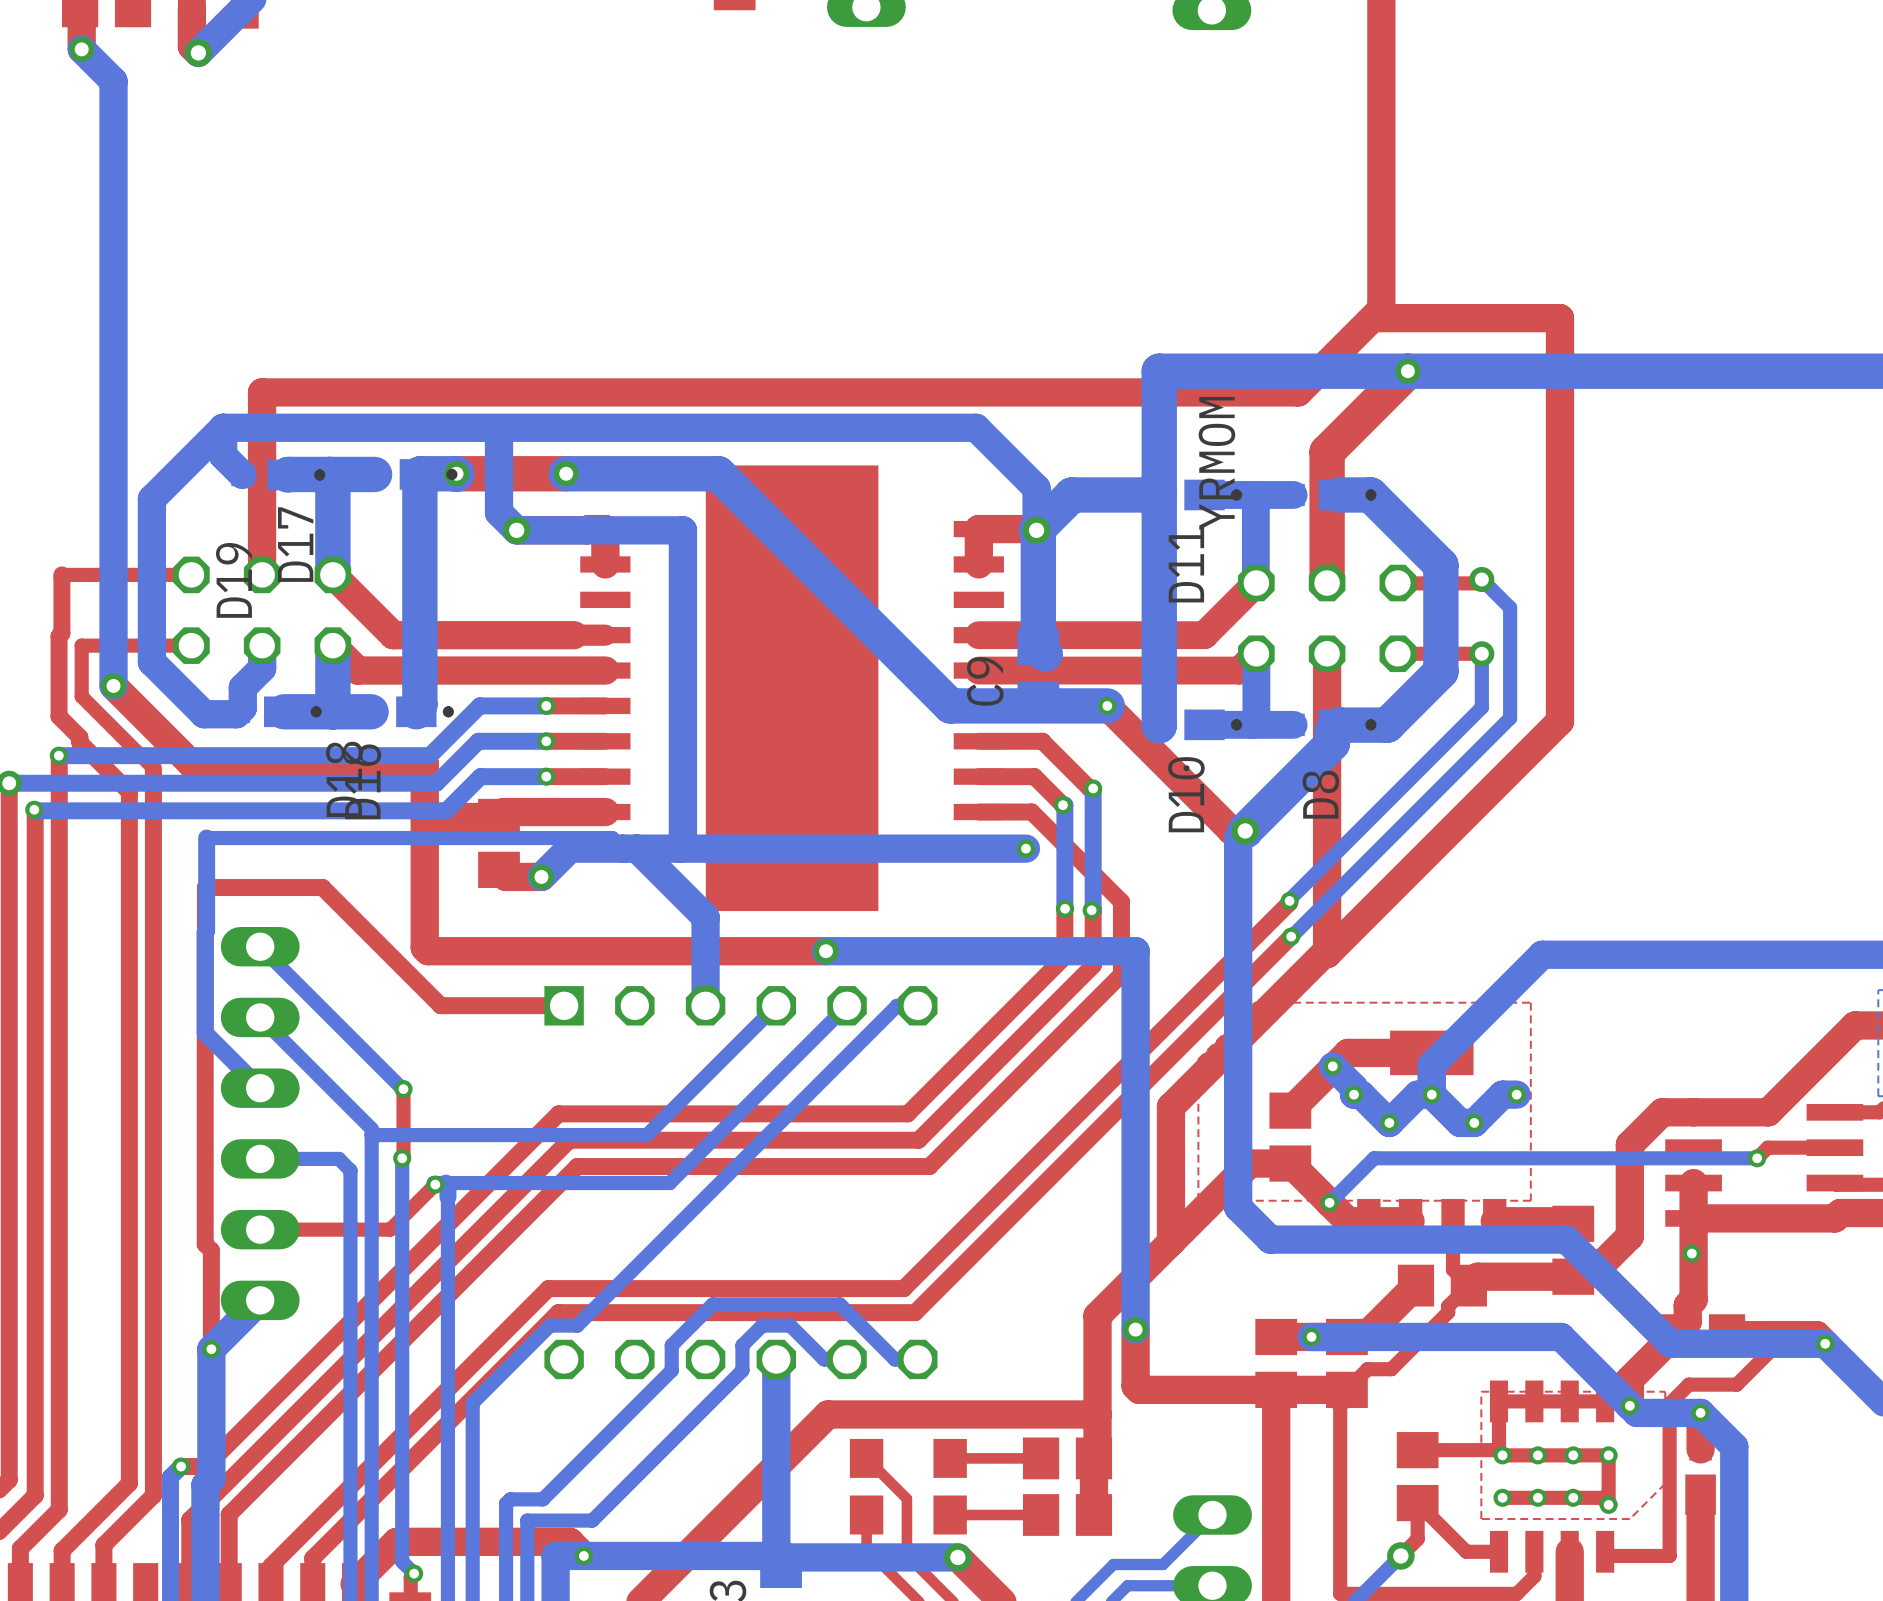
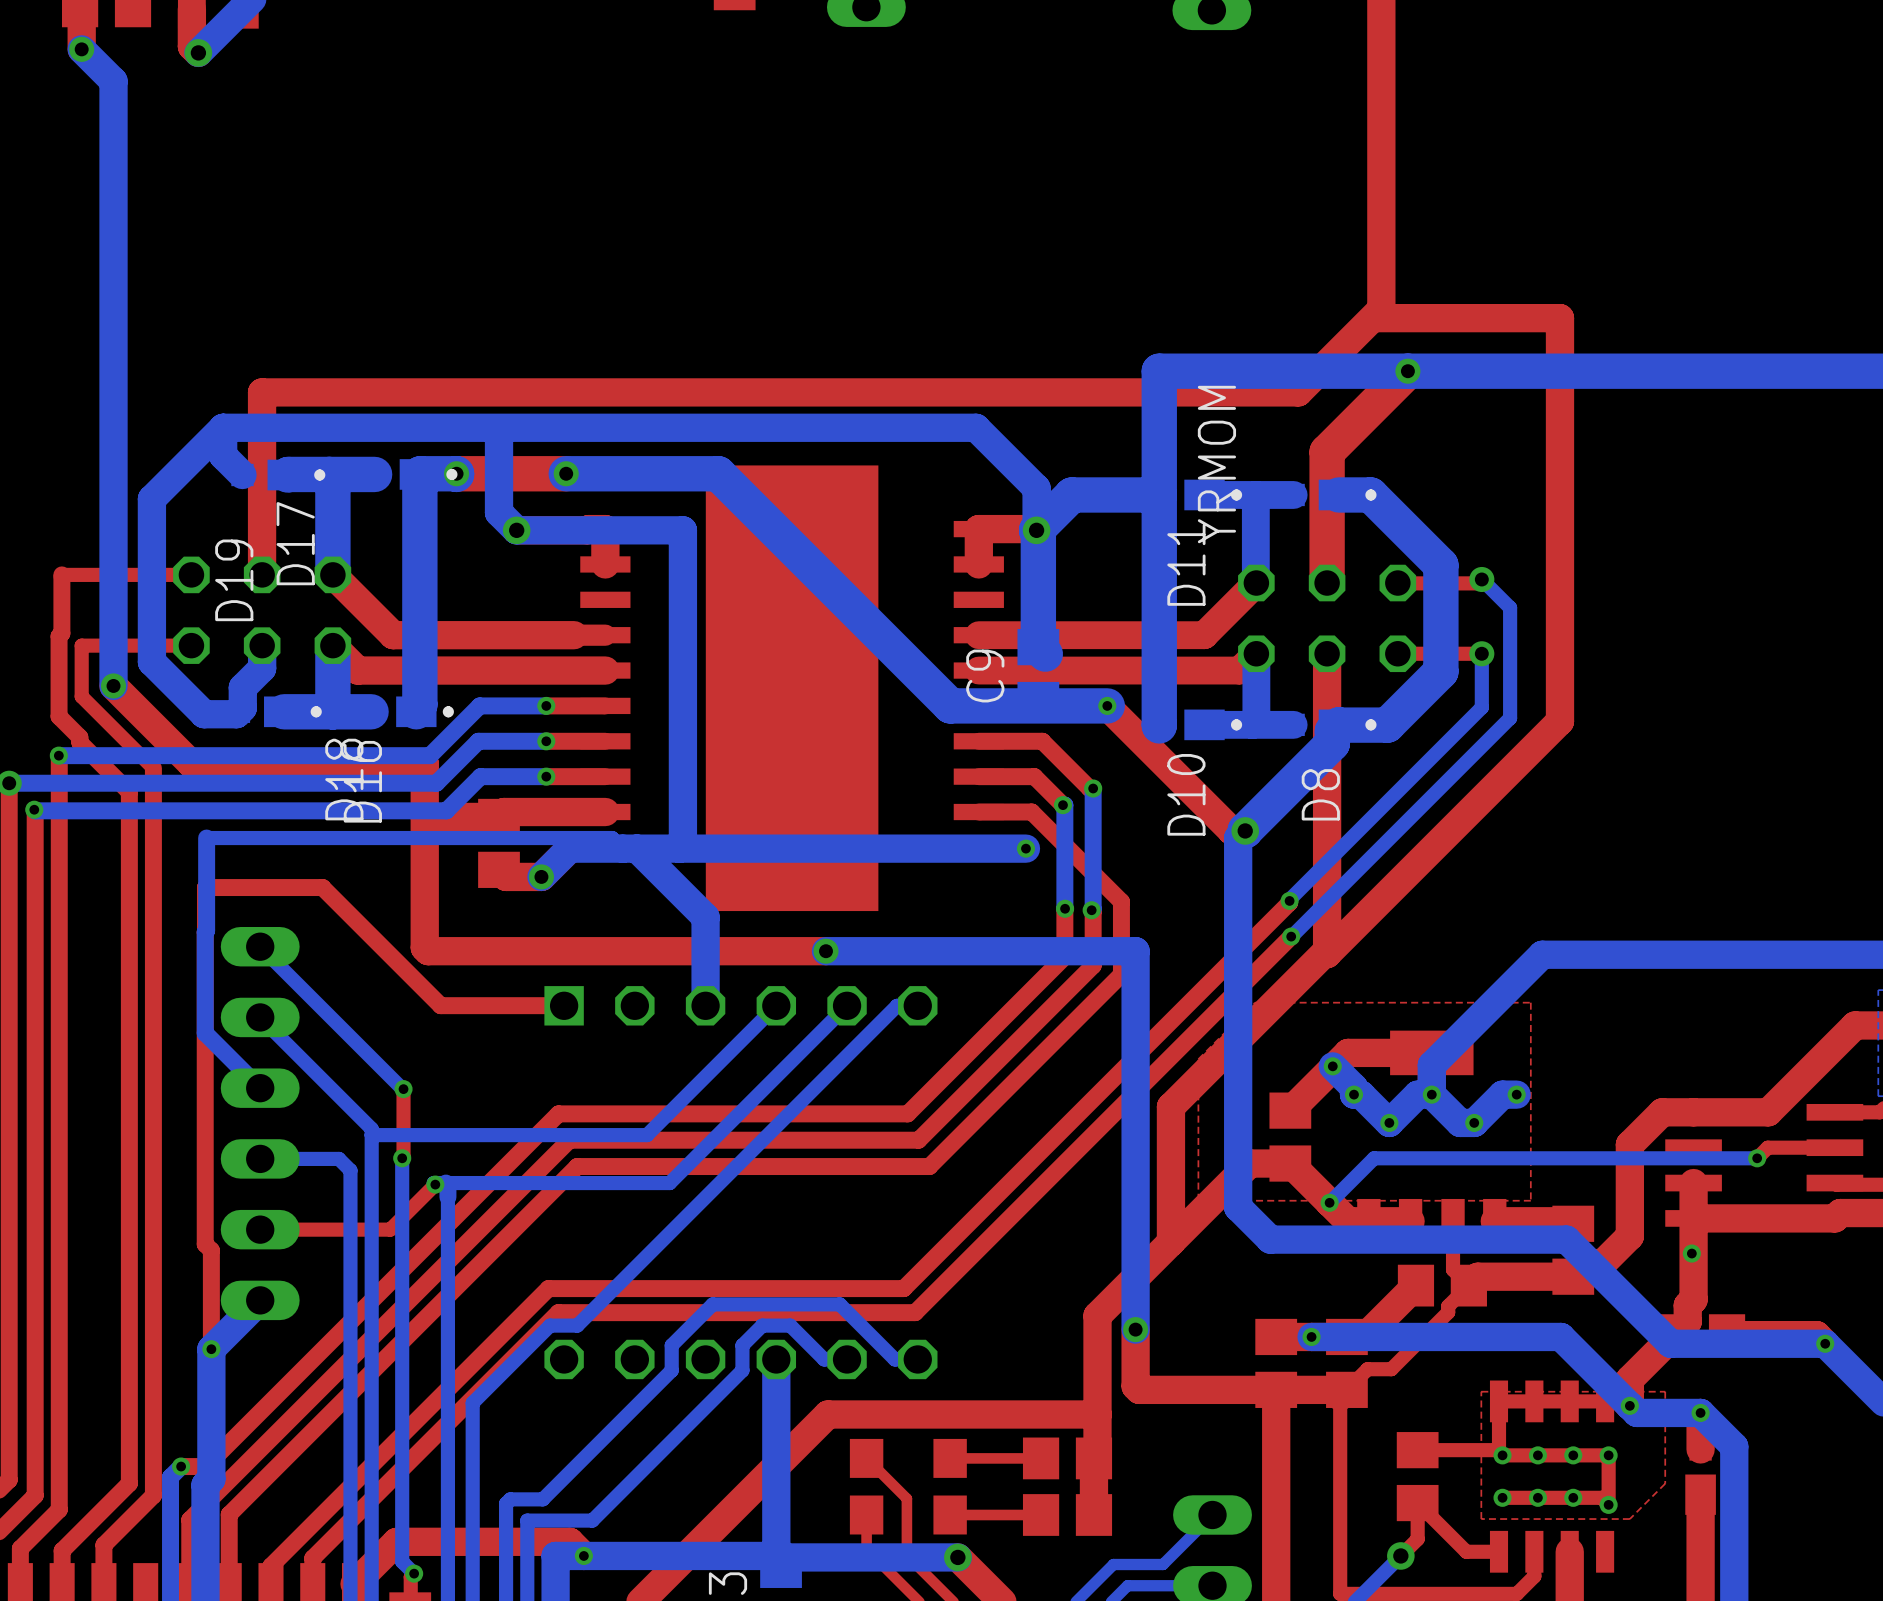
top track: (1786, 1335) (1736, 1384) (1688, 1384) (1669, 1403) (1669, 1555) (1609, 1555) (1605, 1551) -> none

